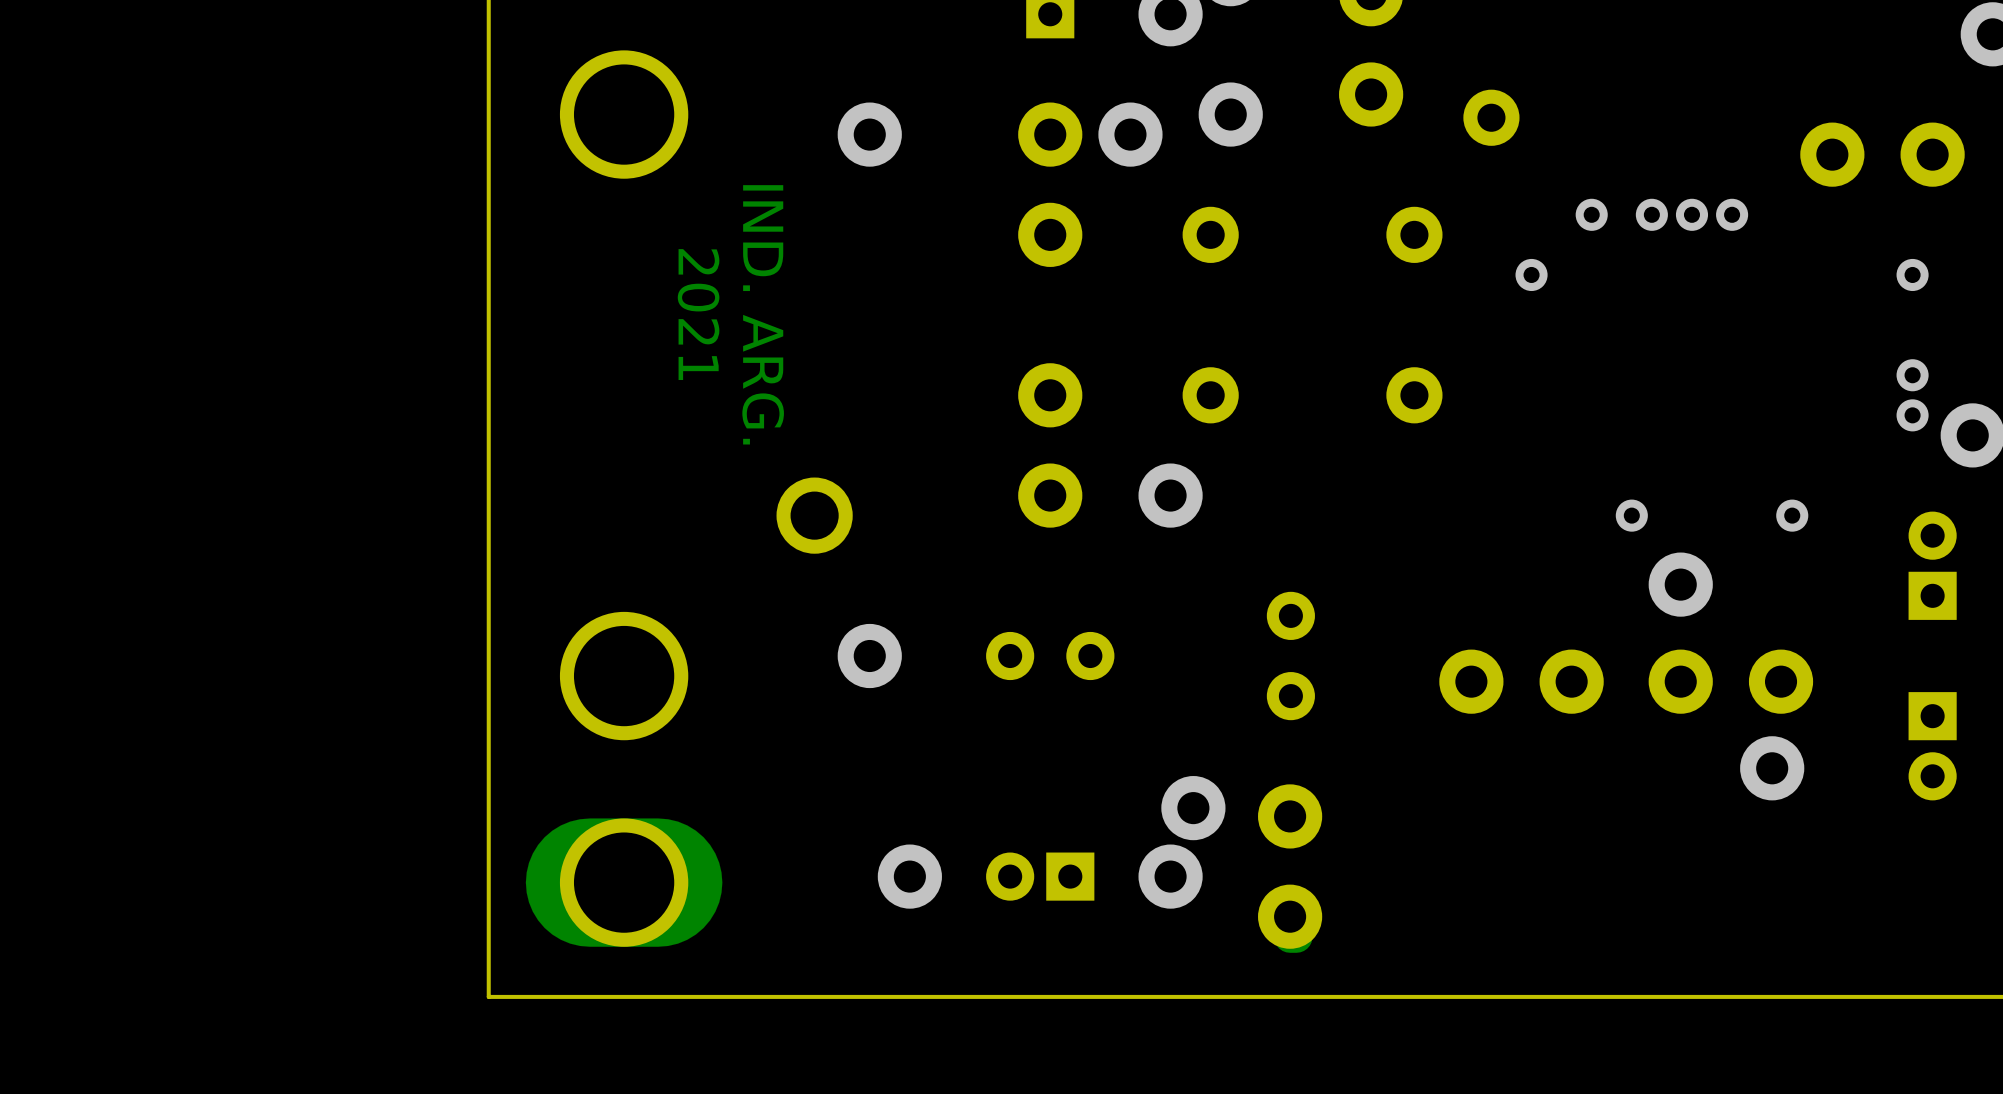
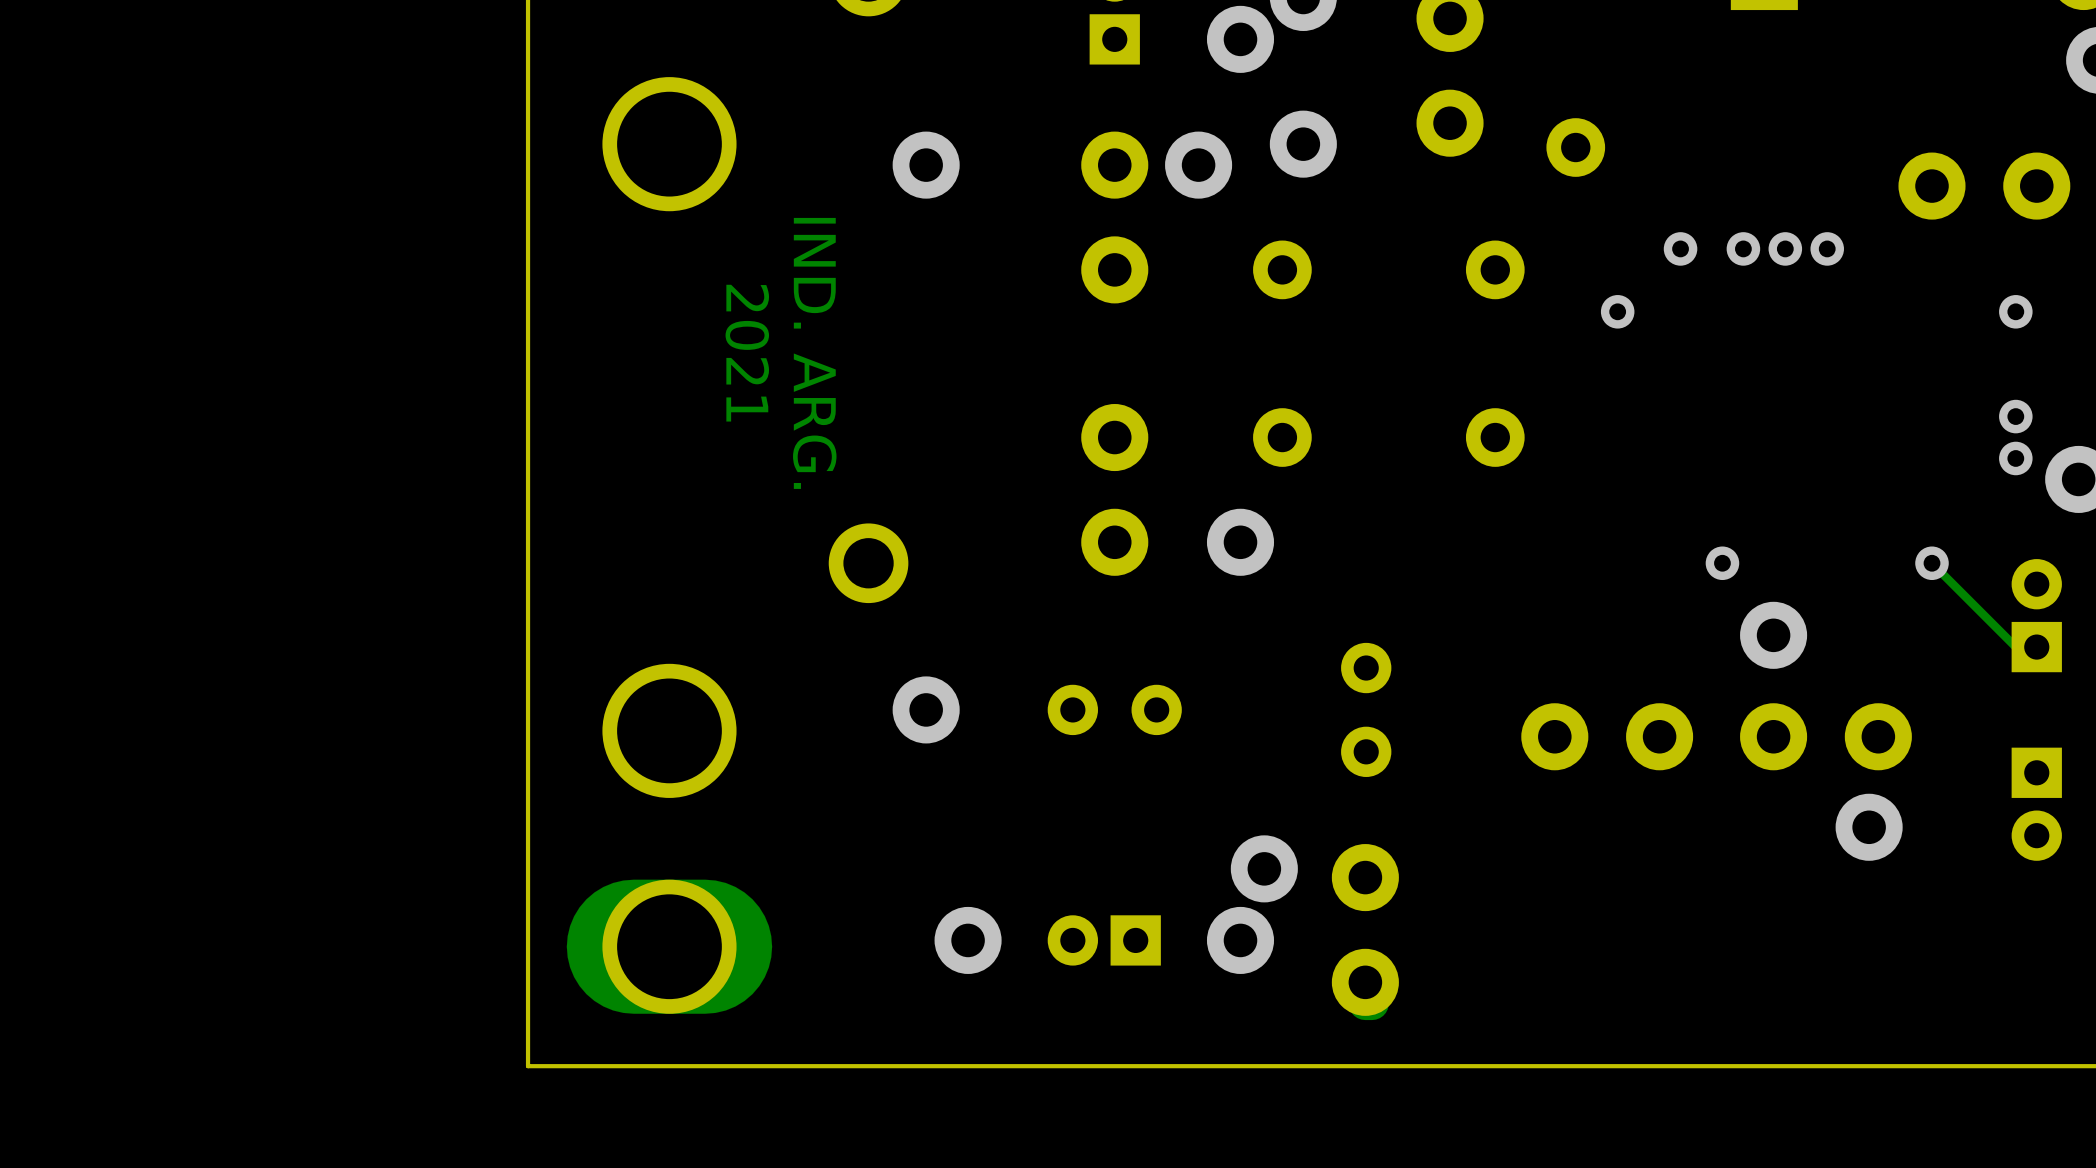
via position: (1792, 515) -> (1932, 563)
track: none -> (1932, 563) (2015, 647) (2036, 647)

